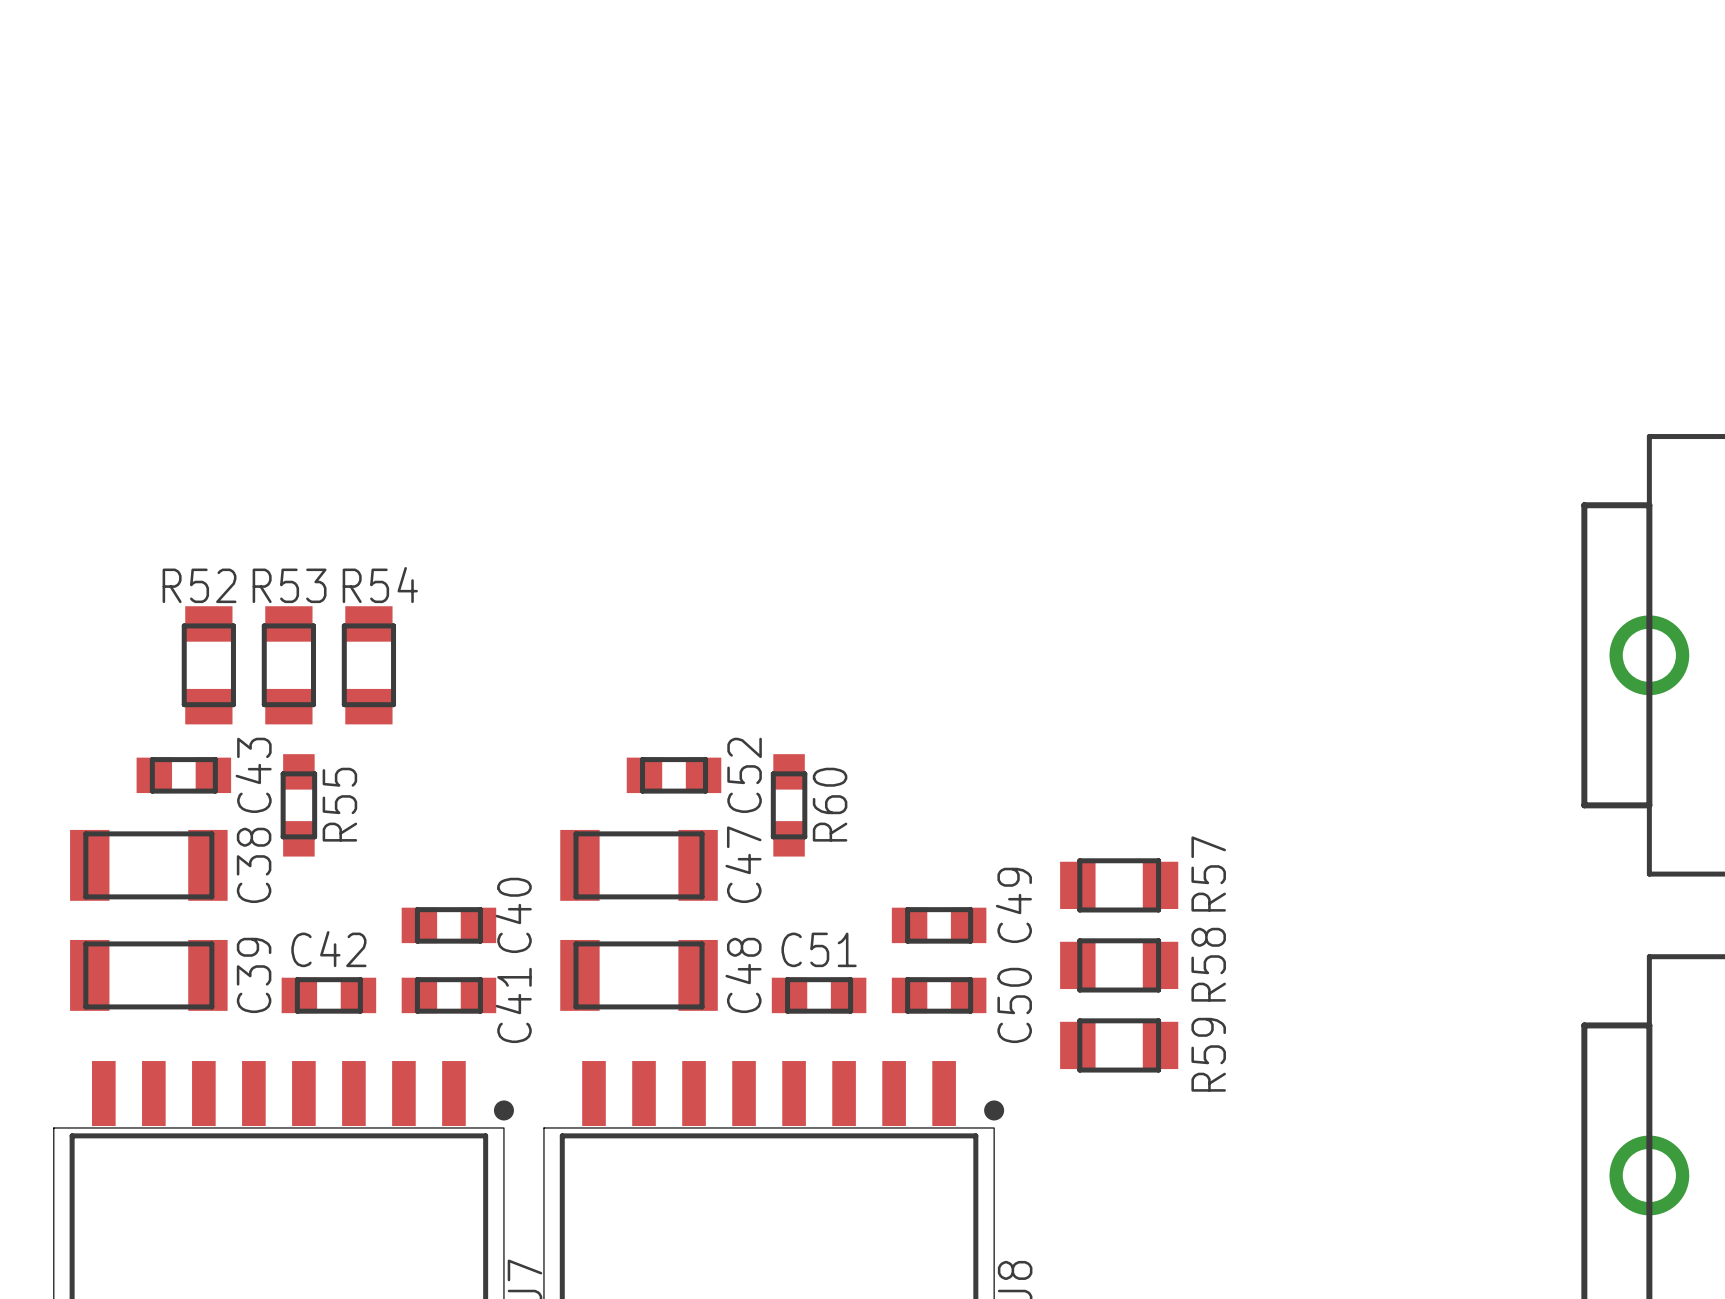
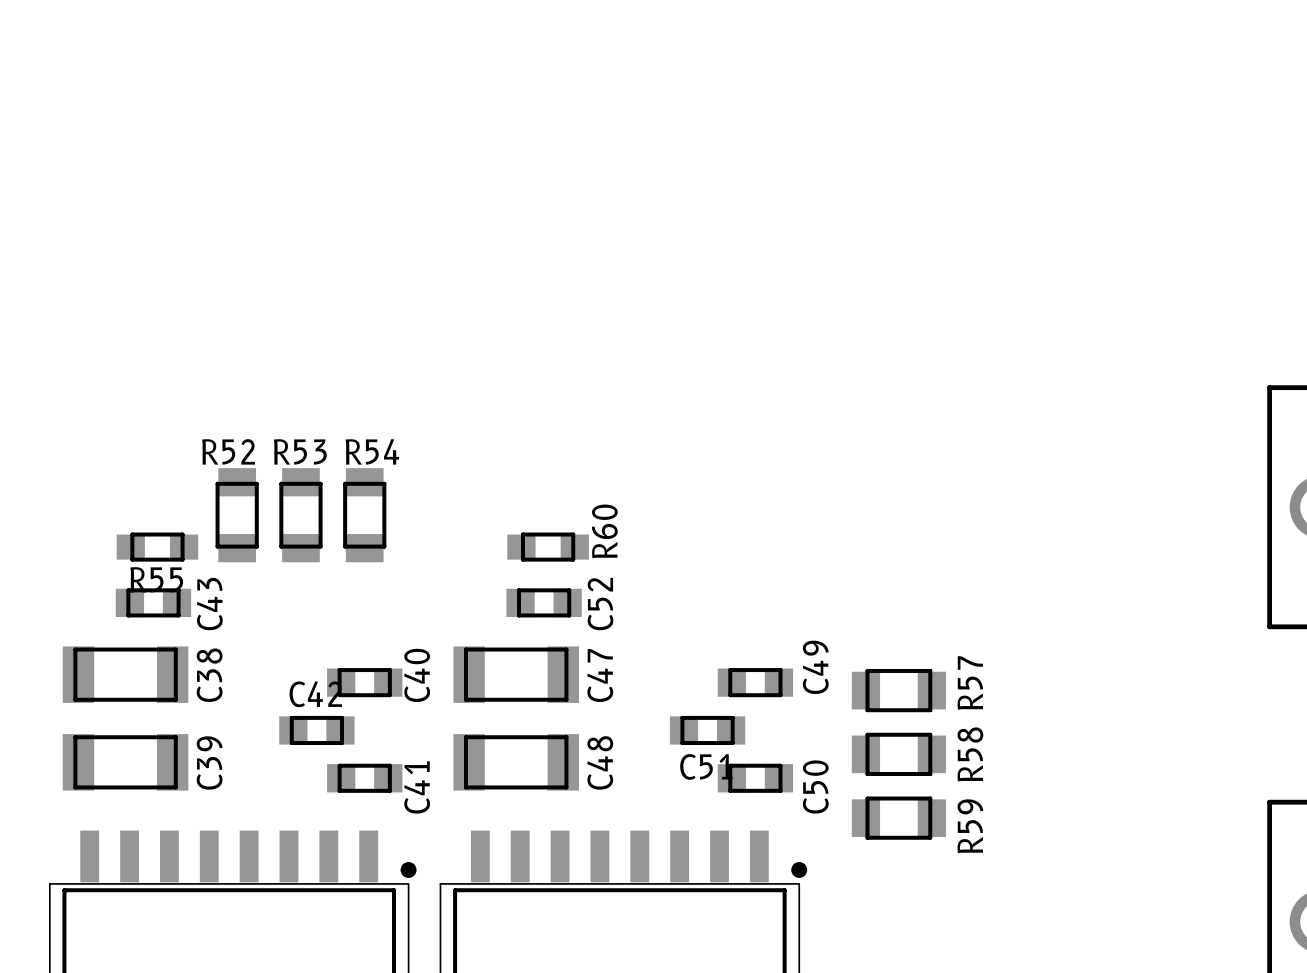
R53 name: R53 (289, 585) -> R52 (228, 451)
R54 name: R54 (380, 585) -> R53 (300, 451)
R52: (208, 665) -> none
R54: none -> (364, 515)
R55 rotation: 0° (298, 805) -> 90° clockwise (157, 547)
R55 position: (298, 805) -> (157, 547)
R60 rotation: 0° (789, 805) -> 90° clockwise (548, 547)
R60 position: (789, 805) -> (548, 547)
C40 position: (448, 925) -> (364, 682)
C49 position: (939, 925) -> (755, 682)
C51 name position: C51 (819, 949) -> C51 (706, 766)
C42 position: (328, 995) -> (316, 730)
C51 position: (819, 995) -> (707, 730)

